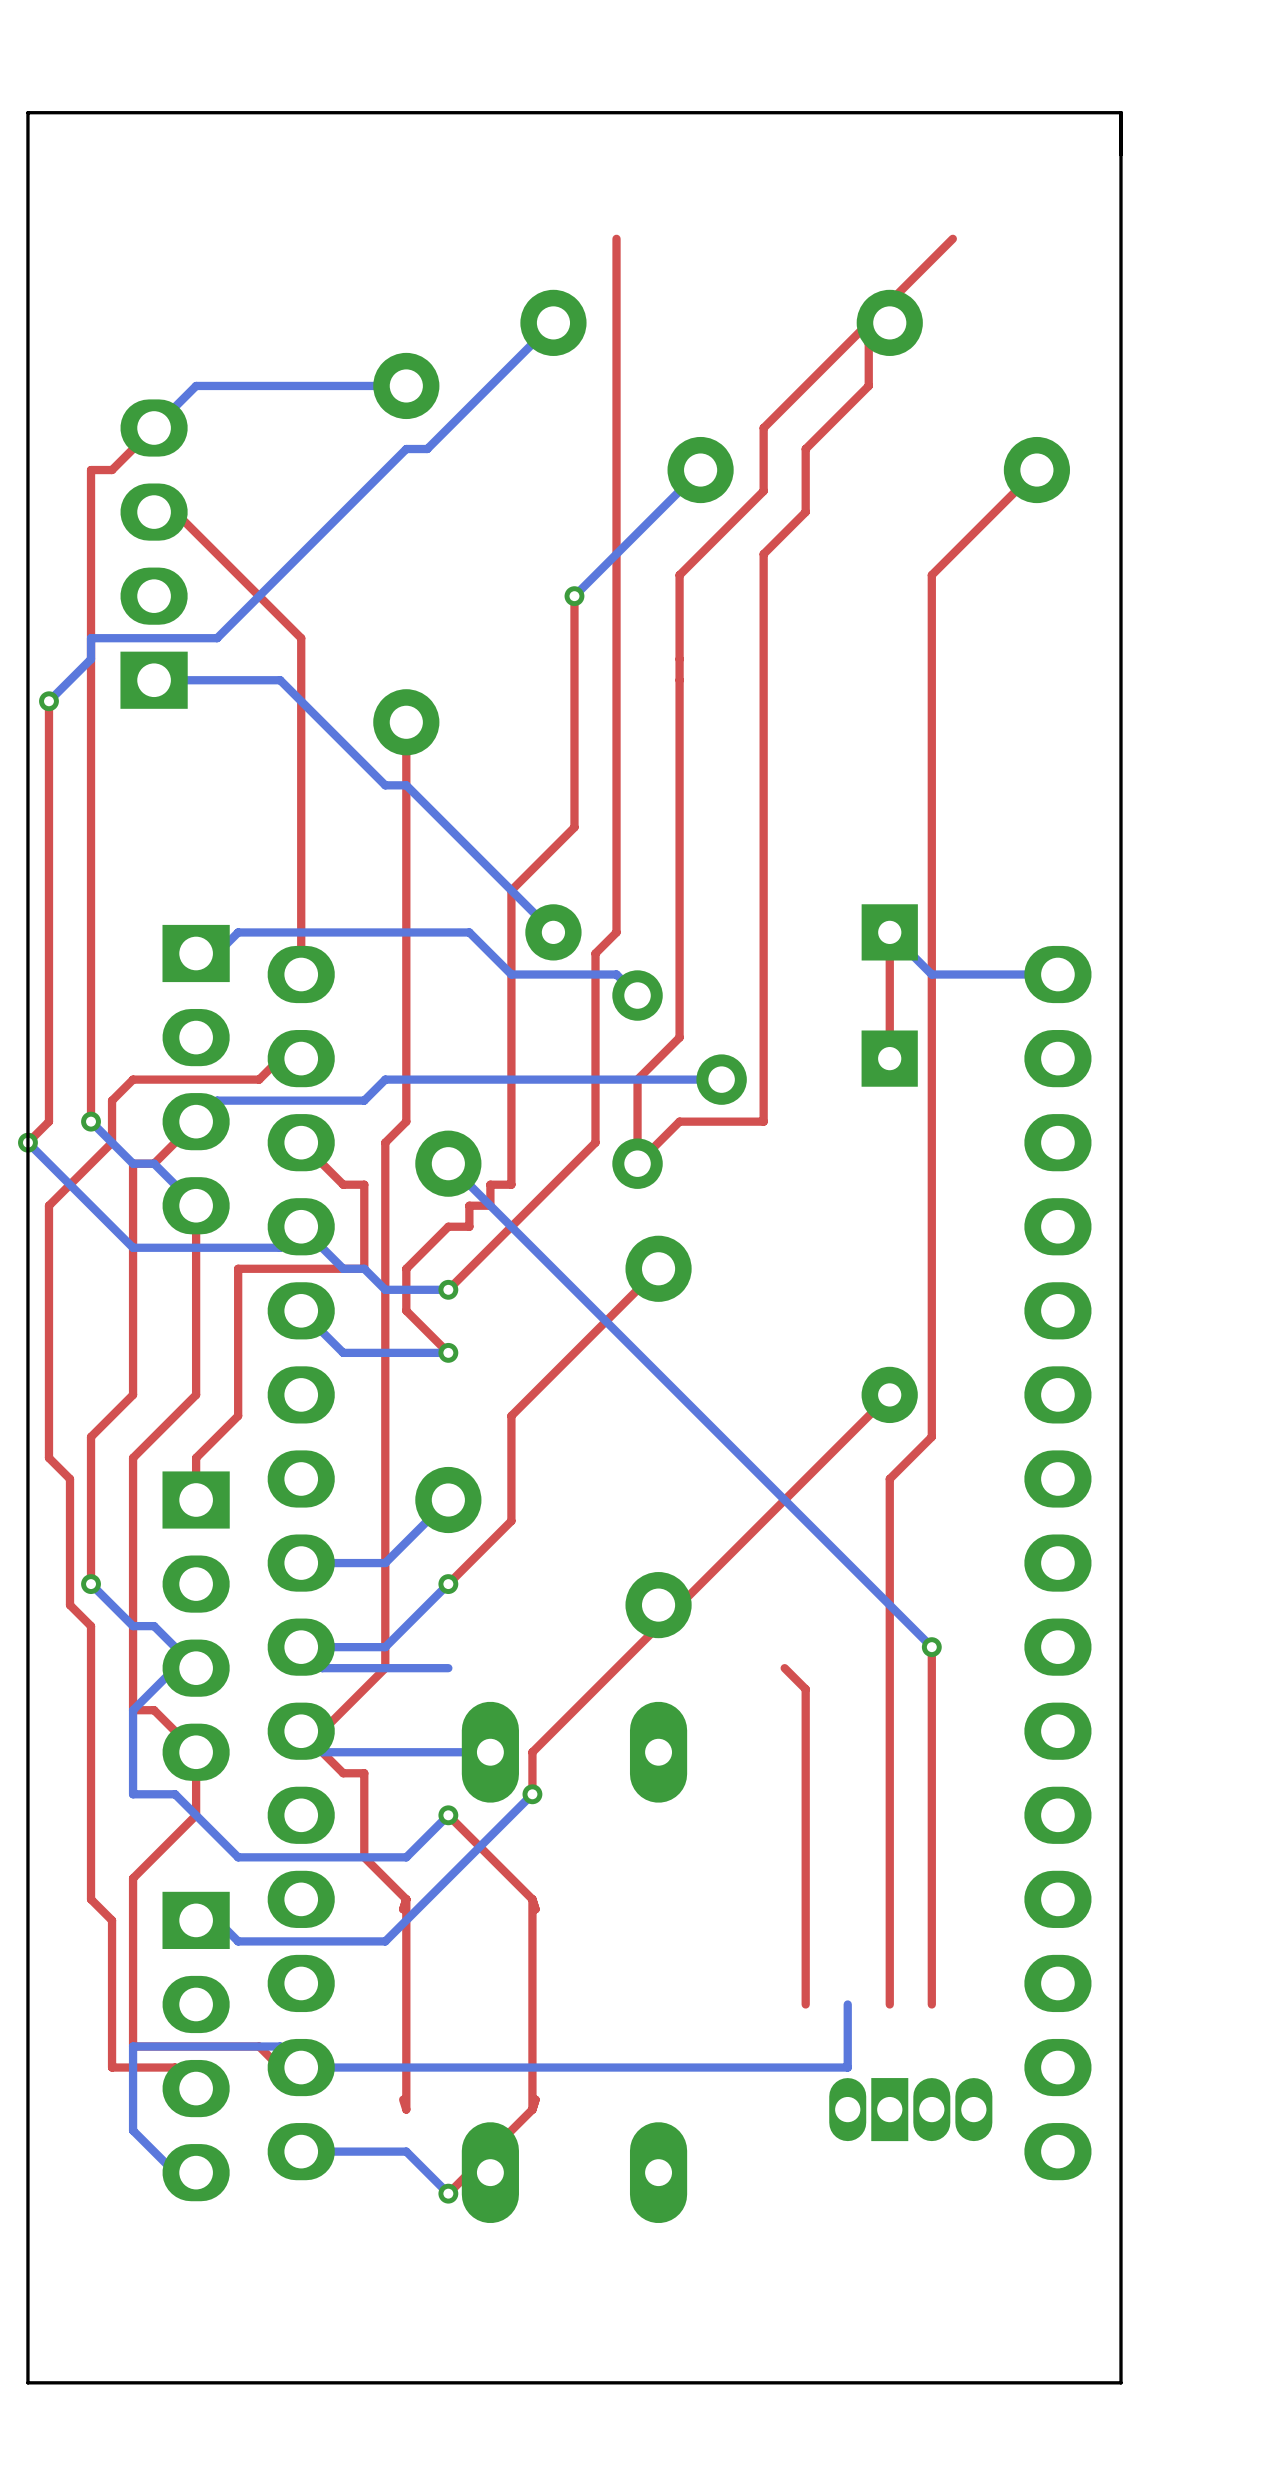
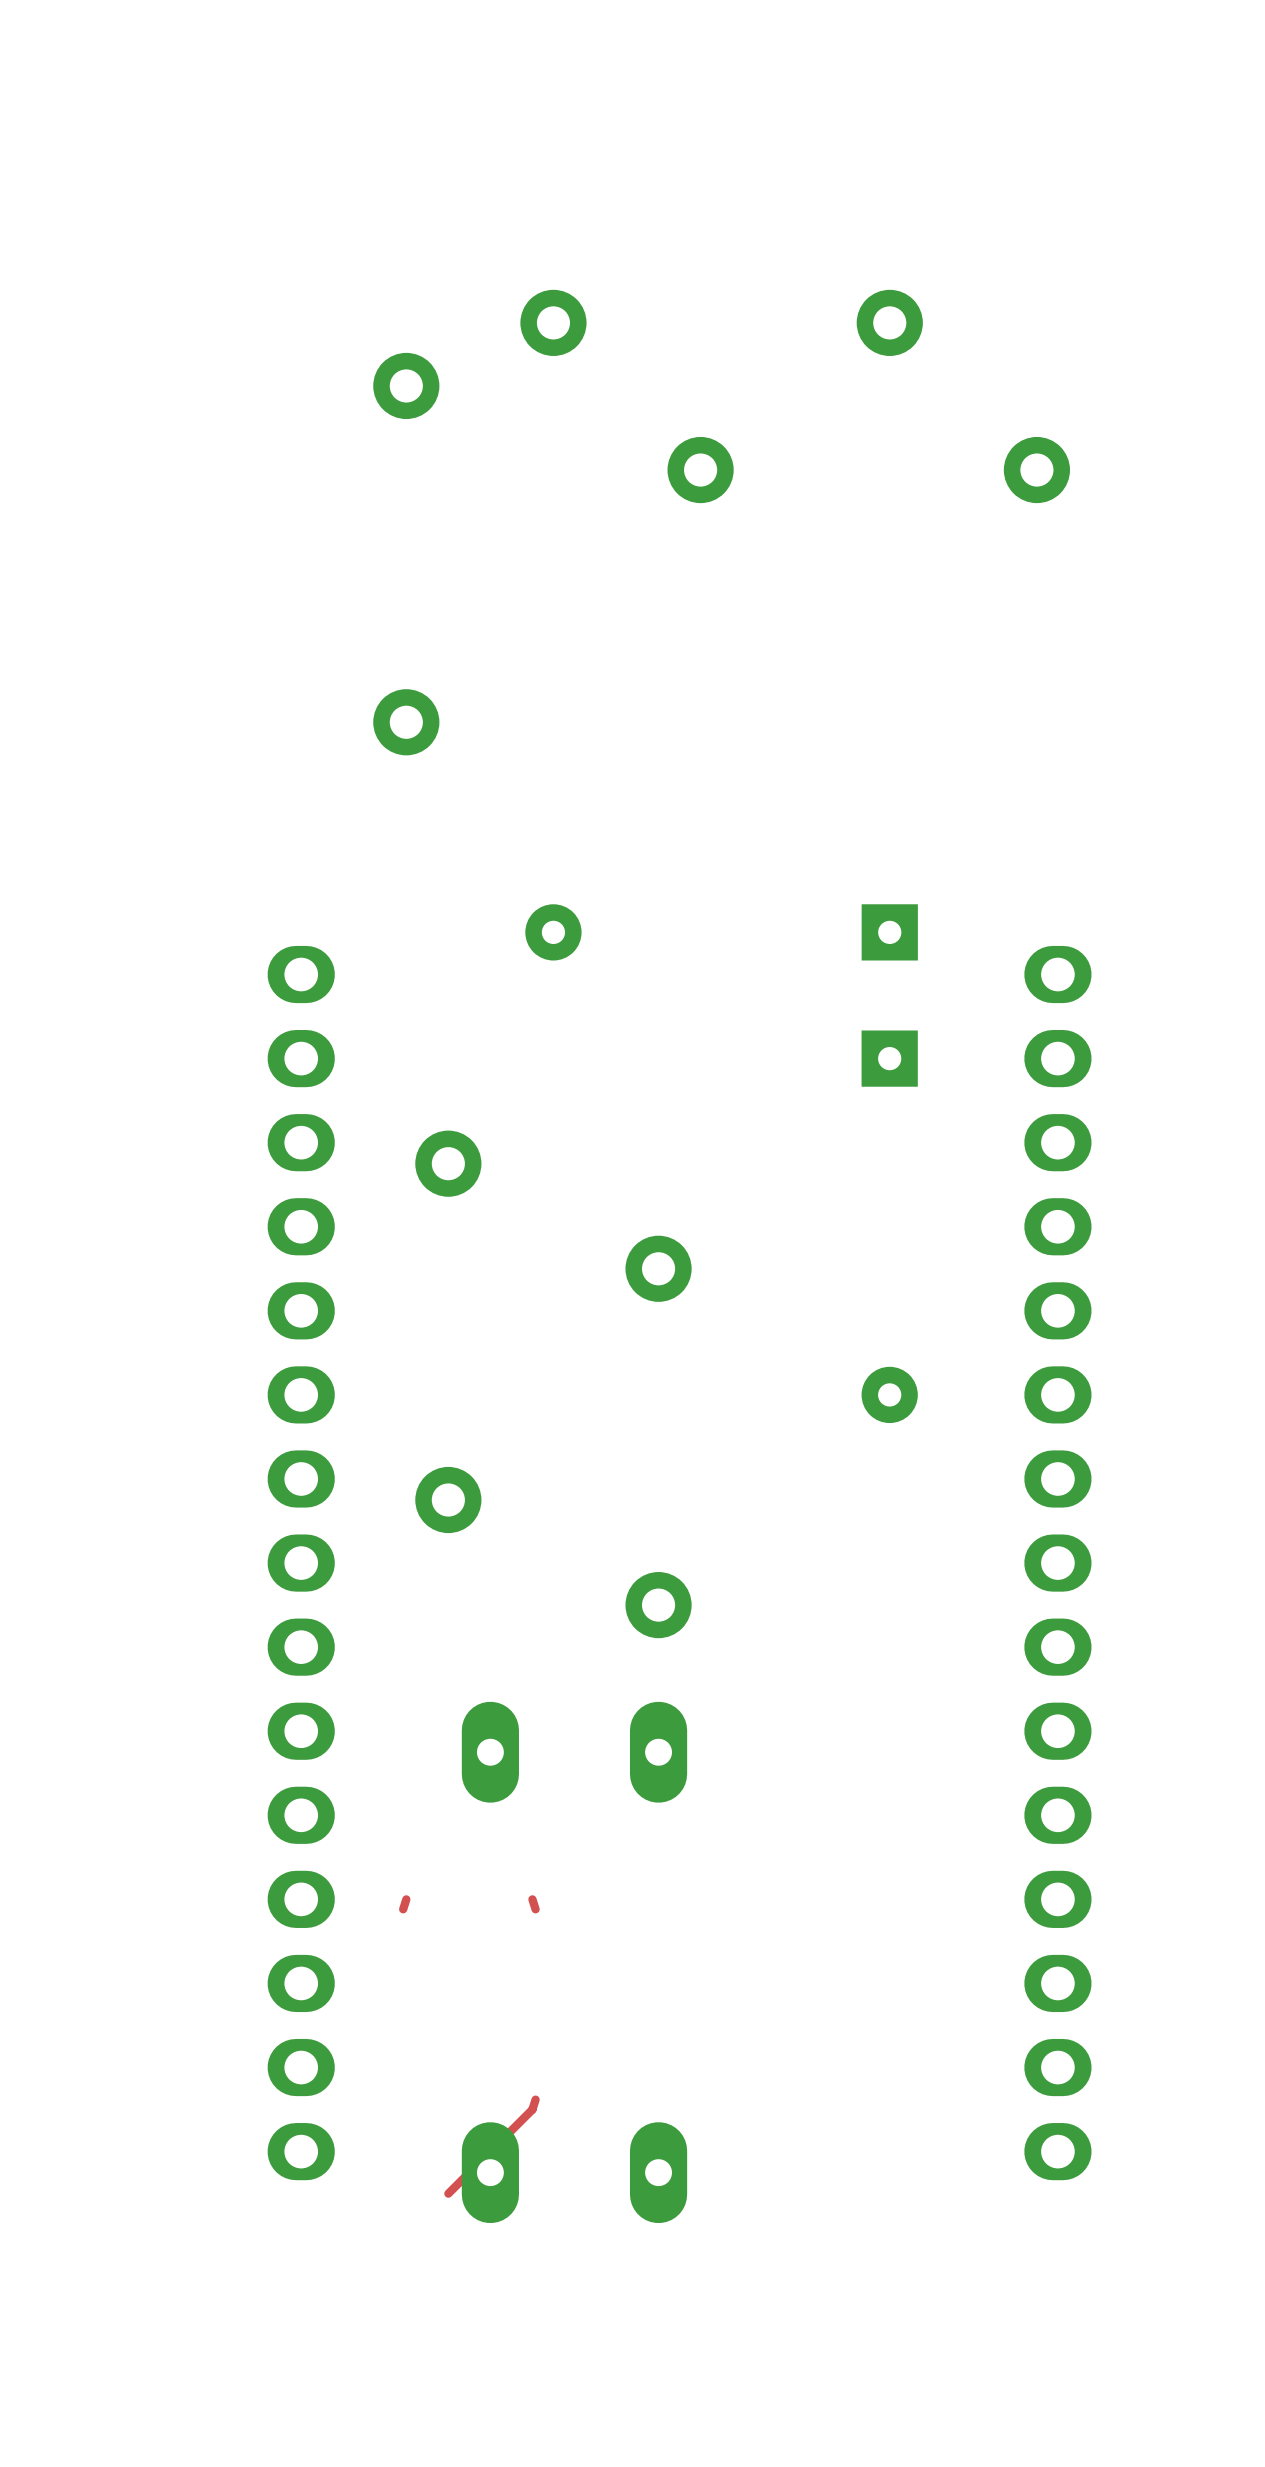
board edge: (1120, 112) (1120, 2382) (27, 2382) (27, 112) (1120, 112) -> none
top track: (616, 238) (616, 932) (595, 953) (595, 1142) (448, 1289) -> none
top track: (952, 238) (763, 428) (763, 491) (679, 575) (679, 1037) (637, 1079) (637, 1163) (679, 1121) (763, 1121) (763, 554) (805, 512) (805, 449) (868, 385) (868, 343) (889, 322) -> none
bottom track: (553, 322) (427, 449) (406, 449) (217, 638) (91, 638) (91, 659) (48, 701) -> none
bottom track: (406, 385) (196, 385) (154, 428) -> none
top track: (154, 428) (112, 470) (91, 470) (91, 1121) -> none
bottom track: (700, 470) (574, 596) -> none
top track: (1036, 470) (931, 575) (931, 1436) (889, 1478) (889, 2004) -> none
top track: (154, 512) (175, 512) (301, 638) (301, 974) -> none
part: (154, 554) -> none
top track: (574, 596) (574, 827) (511, 890) (511, 1184) (490, 1184) (490, 1205) (469, 1205) (469, 1226) (448, 1226) (406, 1268) (406, 1310) (448, 1352) -> none
via: (574, 596) -> none
bottom track: (154, 680) (280, 680) (385, 785) (406, 785) (553, 932) -> none
top track: (48, 701) (48, 1121) (27, 1142) -> none
via: (48, 701) -> none
top track: (406, 722) (406, 1121) (385, 1142) (385, 1668) (322, 1731) (301, 1731) (343, 1773) (364, 1773) (364, 1857) (406, 1899) (406, 2109) (403, 2099) -> none
top track: (889, 932) (889, 1058) -> none
bottom track: (889, 932) (931, 974) (1057, 974) -> none
bottom track: (196, 953) (217, 953) (238, 932) (469, 932) (511, 974) (616, 974) (637, 995) -> none
top track: (301, 1058) (280, 1058) (259, 1079) (133, 1079) (112, 1100) (112, 1142) (48, 1205) (48, 1457) (70, 1478) (70, 1605) (91, 1626) (91, 1899) (112, 1920) (112, 2067) (175, 2067) (196, 2088) -> none
part: (196, 1079) -> none
part: (679, 1079) -> none
bottom track: (721, 1079) (385, 1079) (364, 1100) (217, 1100) (196, 1121) -> none
bottom track: (91, 1121) (133, 1163) (154, 1163) (196, 1205) -> none
via: (91, 1121) -> none
top track: (196, 1121) (154, 1163) (133, 1163) (133, 1394) (91, 1436) (91, 1584) -> none
bottom track: (27, 1142) (133, 1247) (280, 1247) (301, 1226) (343, 1268) (364, 1268) (385, 1289) (448, 1289) -> none
via: (27, 1142) -> none
top track: (301, 1142) (343, 1184) (364, 1184) (364, 1268) (238, 1268) (238, 1415) (196, 1457) (196, 1500) -> none
bottom track: (448, 1163) (931, 1647) -> none
top track: (196, 1205) (196, 1394) (133, 1457) (133, 1710) (154, 1710) (196, 1752) (196, 1815) (133, 1878) (133, 2046) (259, 2046) (280, 2067) (301, 2067) -> none
top track: (658, 1268) (511, 1415) (511, 1521) (448, 1584) -> none
via: (448, 1289) -> none
bottom track: (301, 1310) (343, 1352) (448, 1352) -> none
via: (448, 1352) -> none
top track: (889, 1394) (532, 1752) (532, 1794) -> none
bottom track: (448, 1500) (385, 1563) (301, 1563) -> none
bottom track: (91, 1584) (133, 1626) (154, 1626) (196, 1668) (175, 1668) (133, 1710) (133, 1794) (175, 1794) (238, 1857) (406, 1857) (448, 1815) -> none
via: (91, 1584) -> none
bottom track: (448, 1584) (385, 1647) (301, 1647) (322, 1668) (448, 1668) -> none
via: (448, 1584) -> none
part: (196, 1626) -> none
top track: (931, 1647) (931, 2004) -> none
via: (931, 1647) -> none
top track: (784, 1668) (805, 1689) (805, 2004) -> none
bottom track: (301, 1731) (322, 1752) (490, 1752) -> none
bottom track: (532, 1794) (385, 1941) (238, 1941) (217, 1920) (196, 1920) -> none
via: (532, 1794) -> none
top track: (448, 1815) (532, 1899) (532, 2109) -> none
via: (448, 1815) -> none
bottom track: (847, 2004) (847, 2067) (301, 2067) (280, 2046) (133, 2046) (133, 2130) (175, 2172) (196, 2172) -> none
part: (196, 2046) -> none
part: (910, 2109) -> none
bottom track: (301, 2151) (406, 2151) (448, 2193) -> none
via: (448, 2193) -> none

